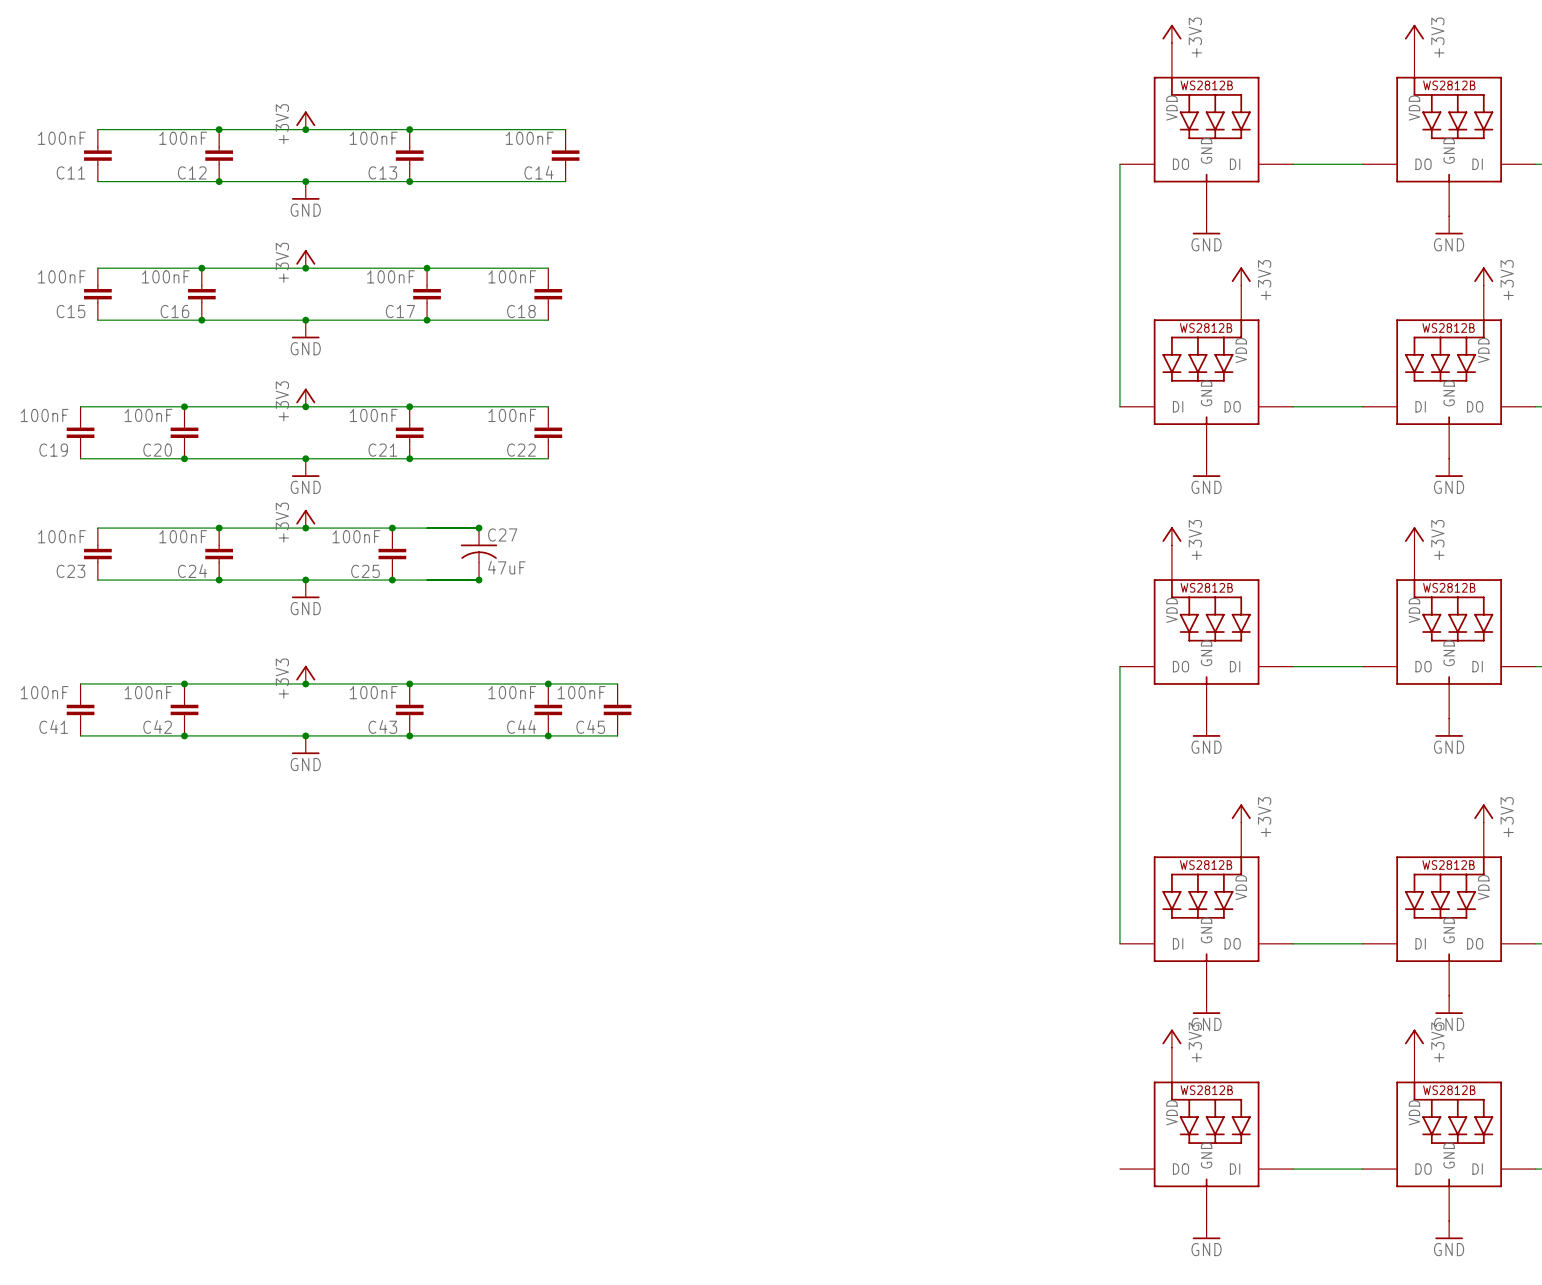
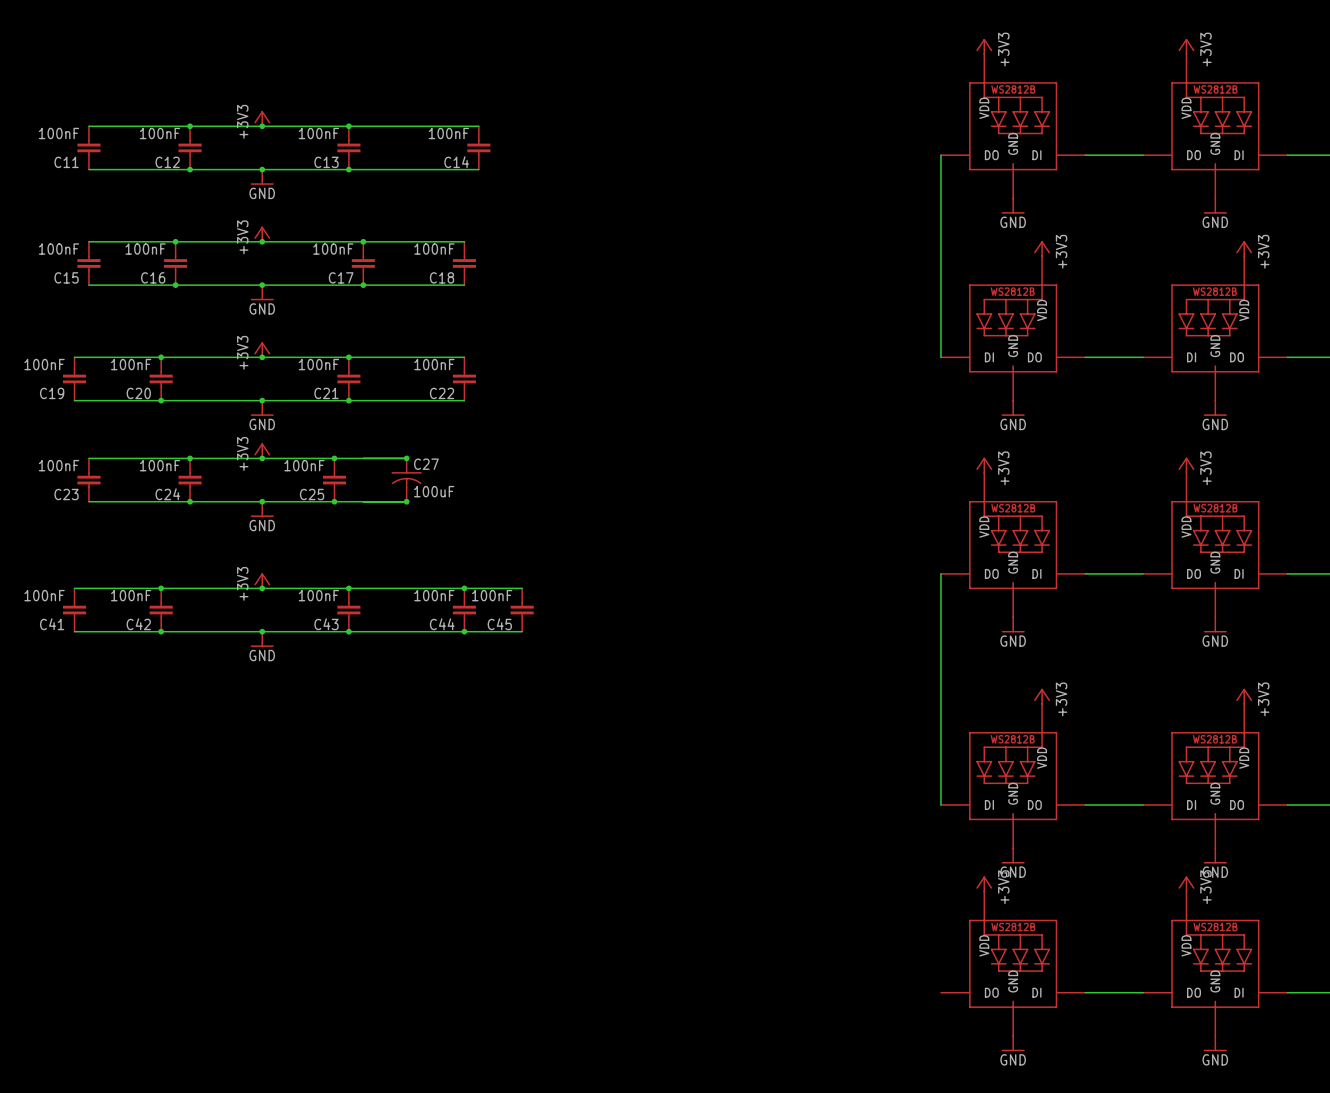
C27 value: 47uF (506, 567) -> 100uF (434, 491)

